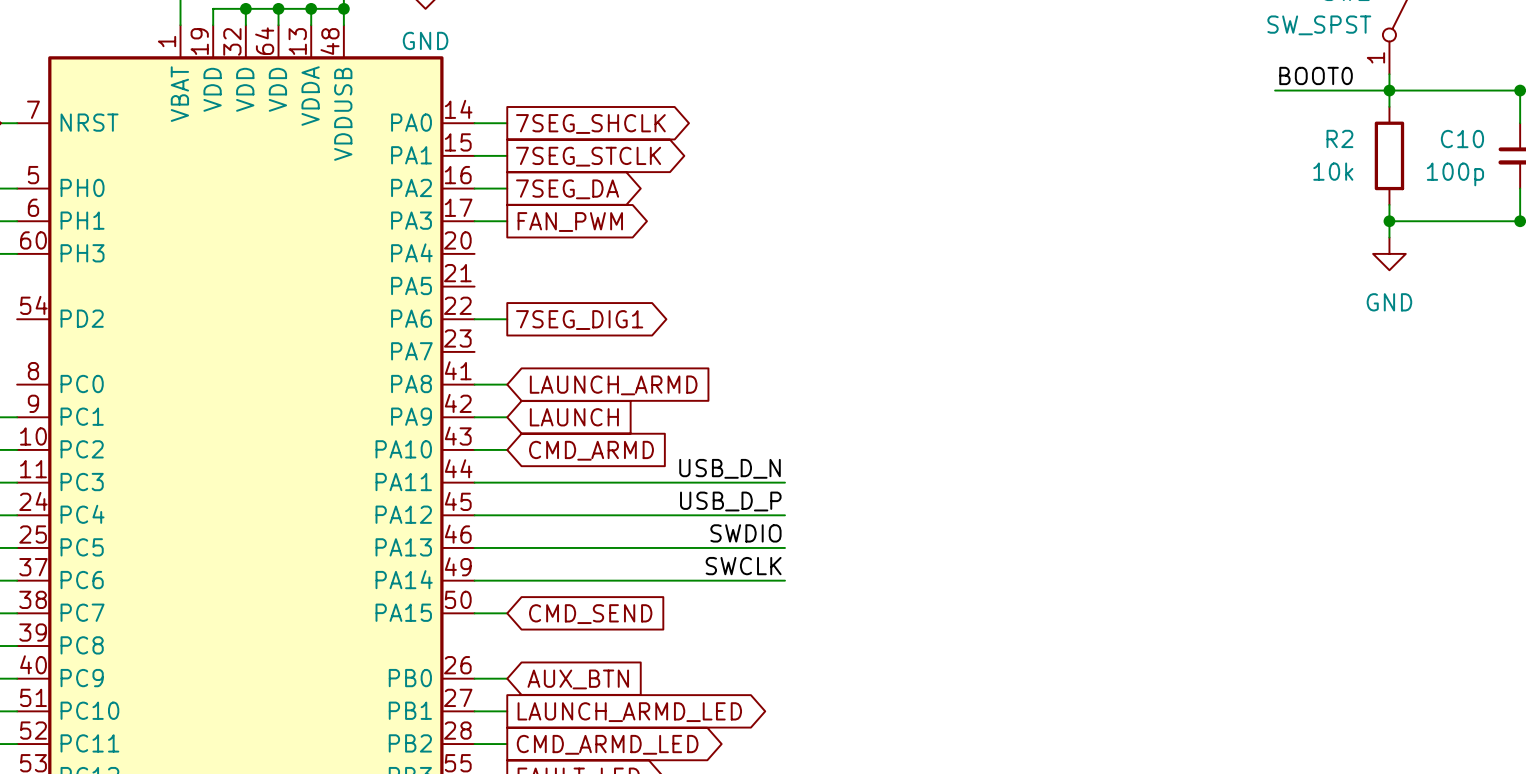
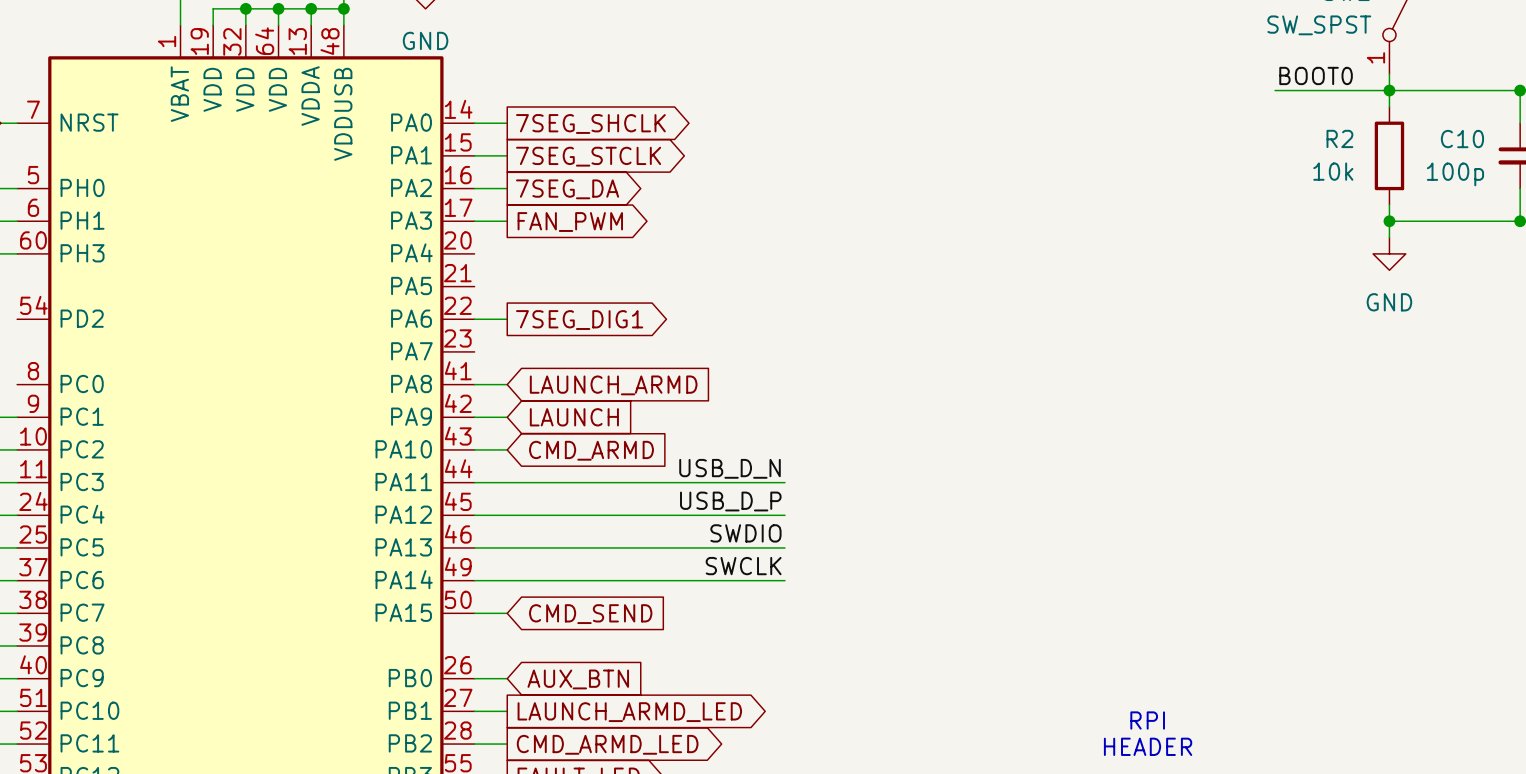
text: none -> RPI (1147, 720)
text: none -> HEADER (1148, 746)

